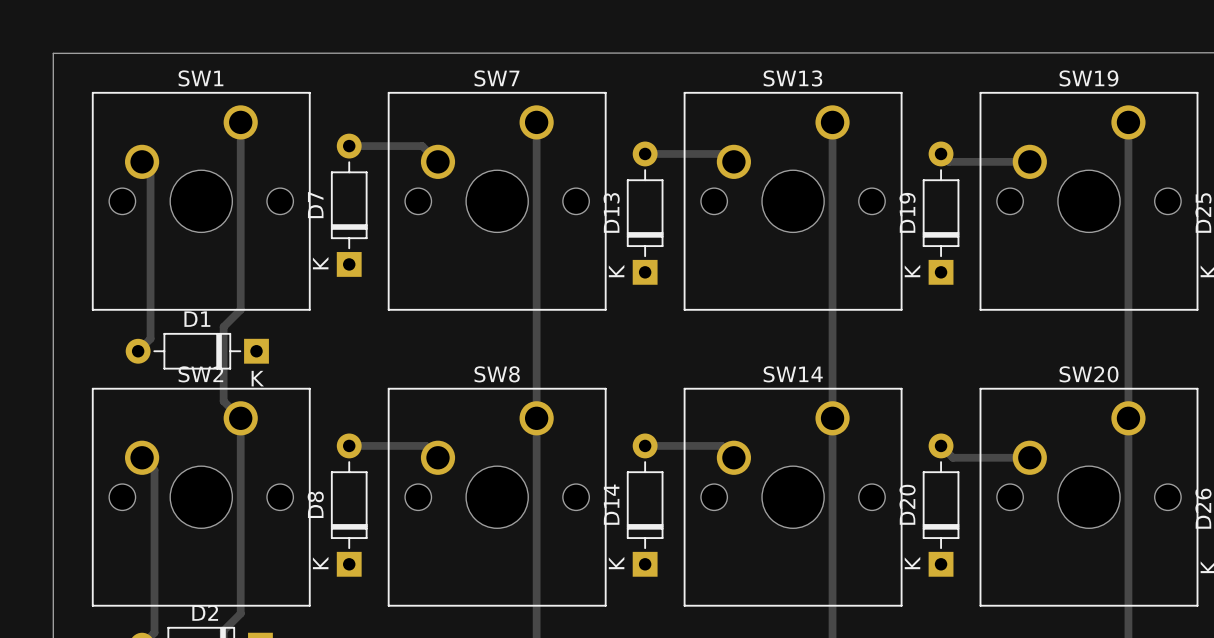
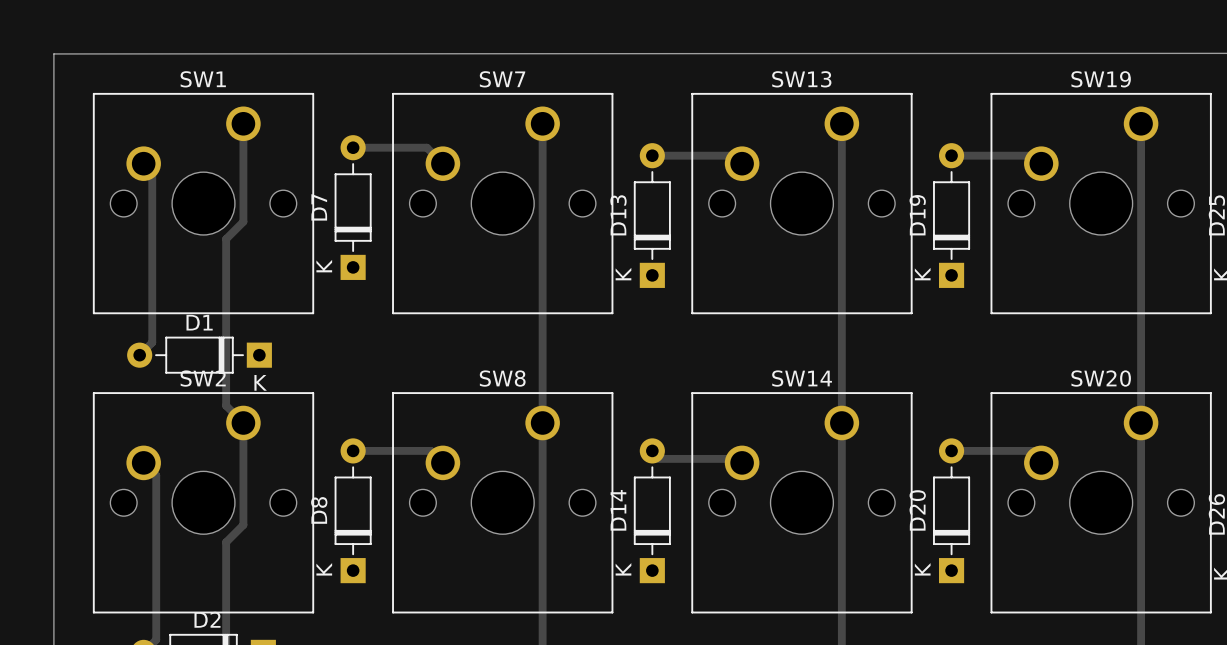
track: (941, 153) (948, 161) (1029, 161) -> none
track: none -> (961, 155) (1045, 155)
track: (240, 219) (240, 309) (223, 326) -> (243, 221) (226, 239) (226, 330)
track: (645, 445) (722, 445) (733, 457) -> none
track: (941, 445) (952, 457) (1029, 457) -> none
track: none -> (961, 450) (1037, 450) (1053, 466)
track: none -> (658, 458) (742, 458)
track: (240, 519) (240, 613) (223, 630) -> (243, 524) (226, 542) (226, 637)

